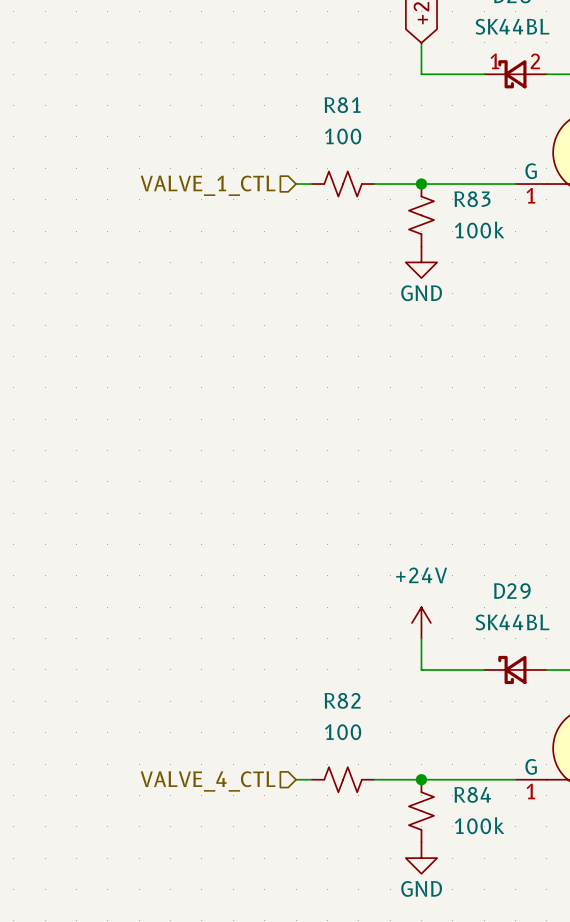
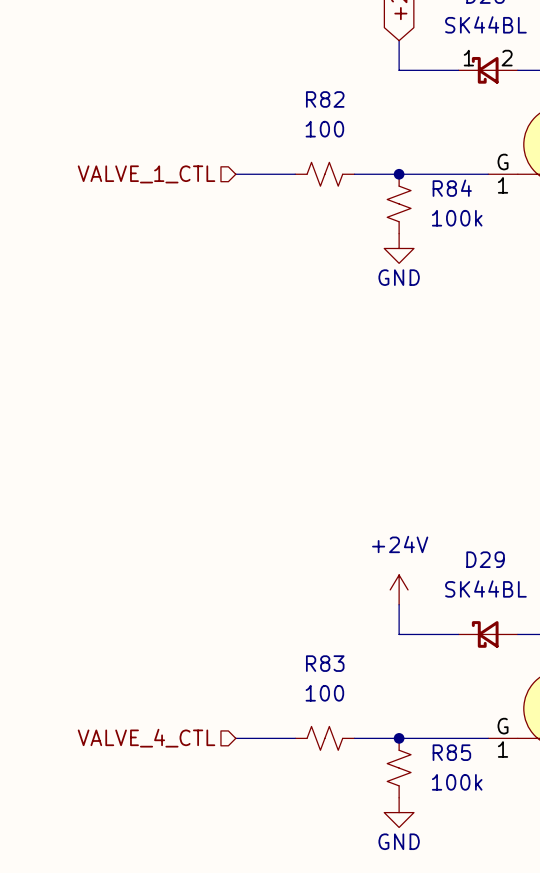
R81 name: R81 (342, 105) -> R82 (325, 99)
wire: none -> (235, 174) (280, 174)
hierarchical label position: VALVE_1_CTL (208, 185) -> VALVE_1_CTL (146, 174)
R83 name: R83 (472, 199) -> R84 (452, 188)
R82 name: R82 (342, 700) -> R83 (325, 663)
wire: none -> (235, 738) (280, 738)
hierarchical label position: VALVE_4_CTL (208, 781) -> VALVE_4_CTL (146, 738)
R84 name: R84 (472, 794) -> R85 (451, 752)

